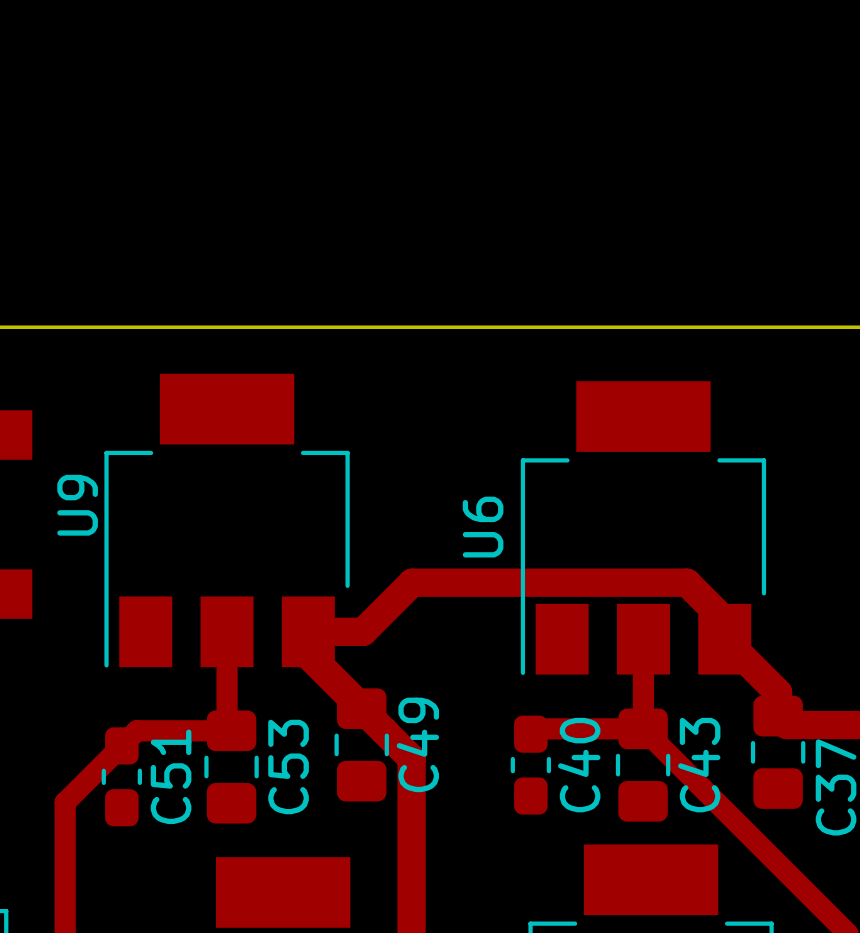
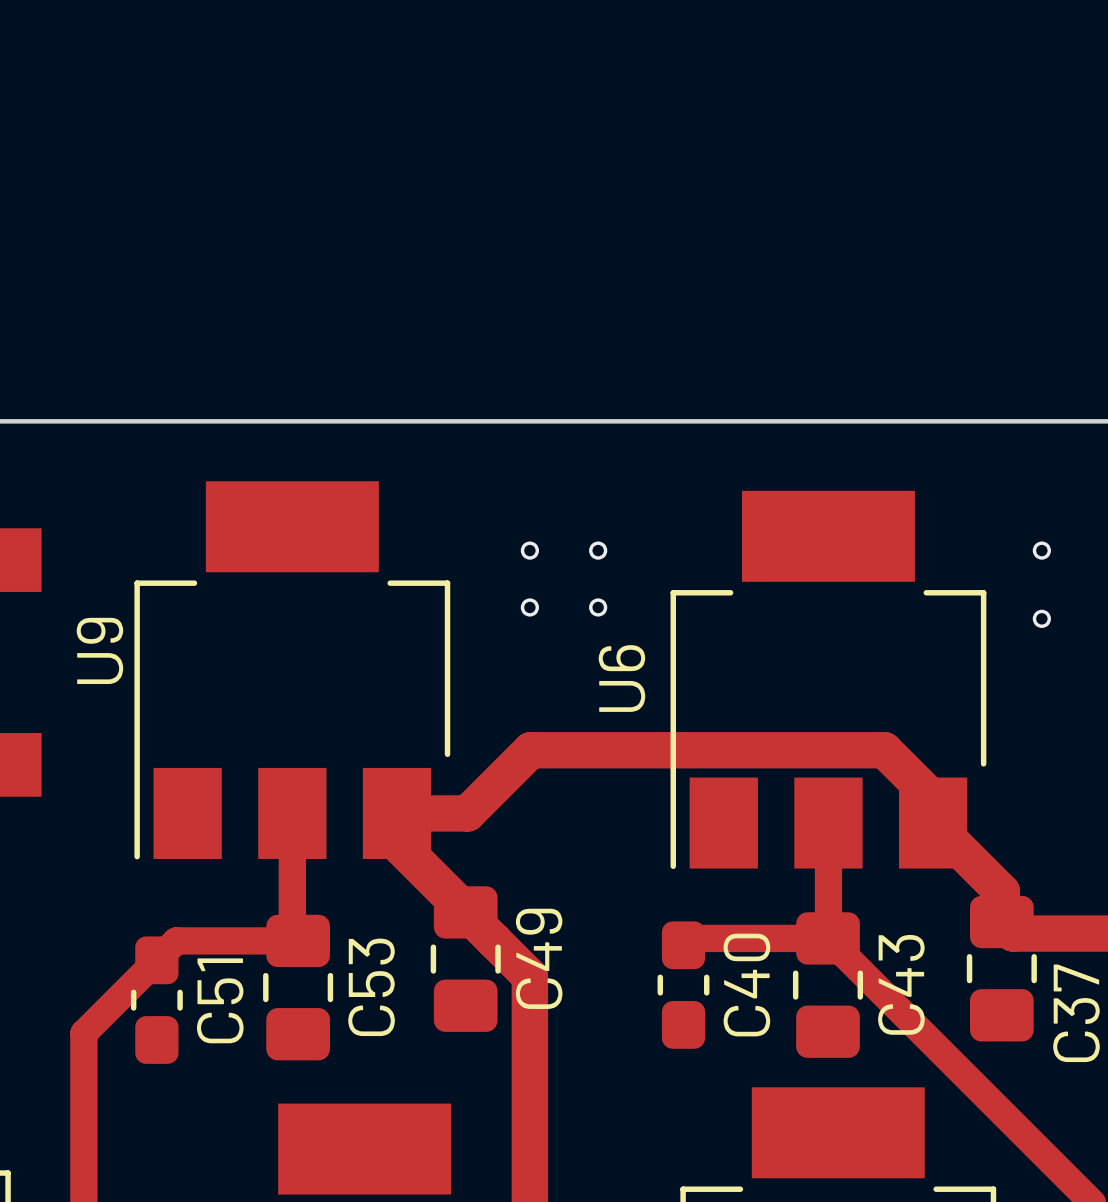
via: none -> (529, 550)
via: none -> (598, 550)
via: none -> (1041, 550)
via: none -> (529, 607)
via: none -> (598, 607)
via: none -> (1041, 618)

